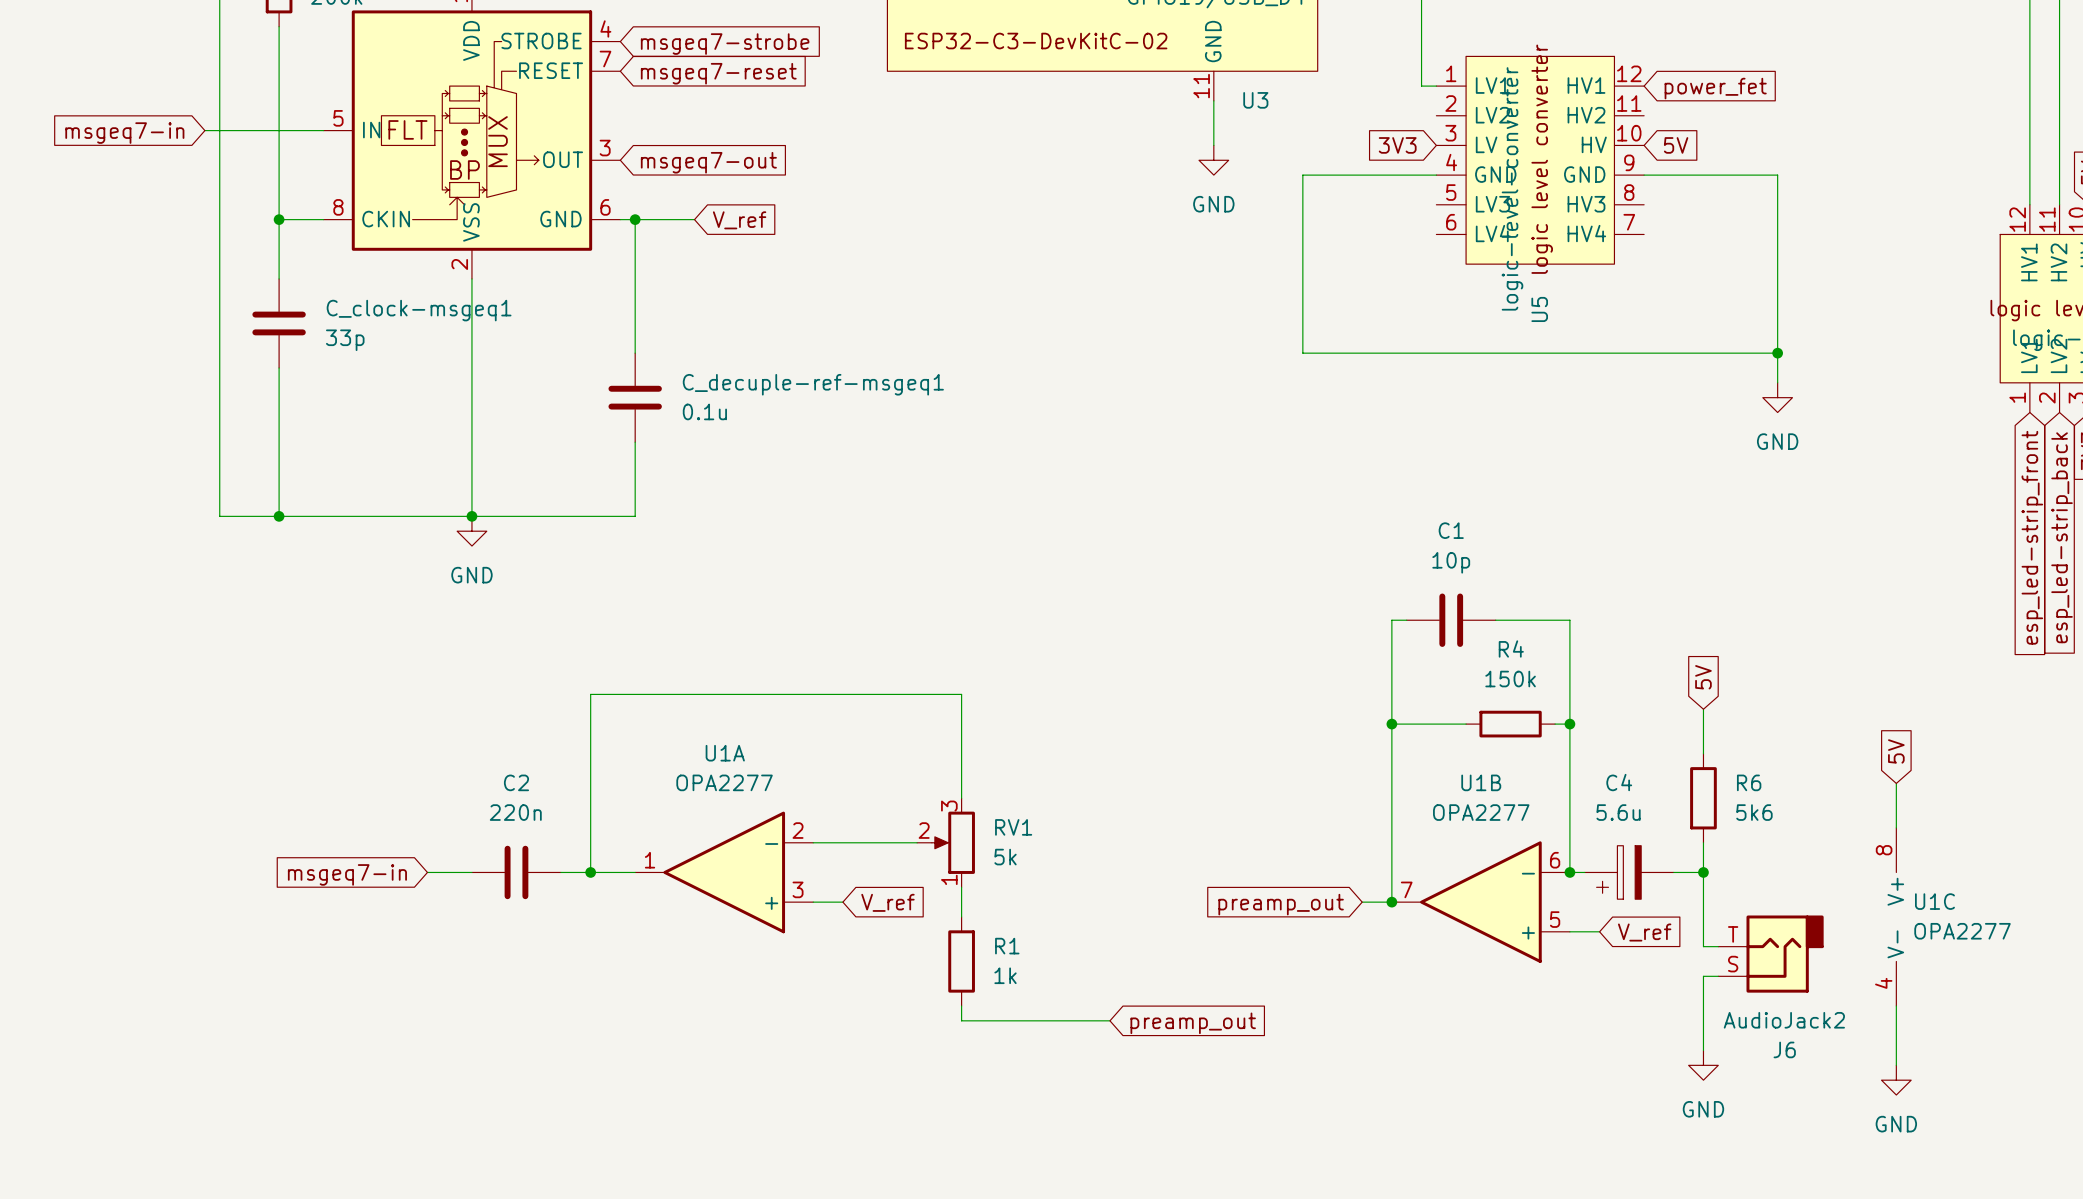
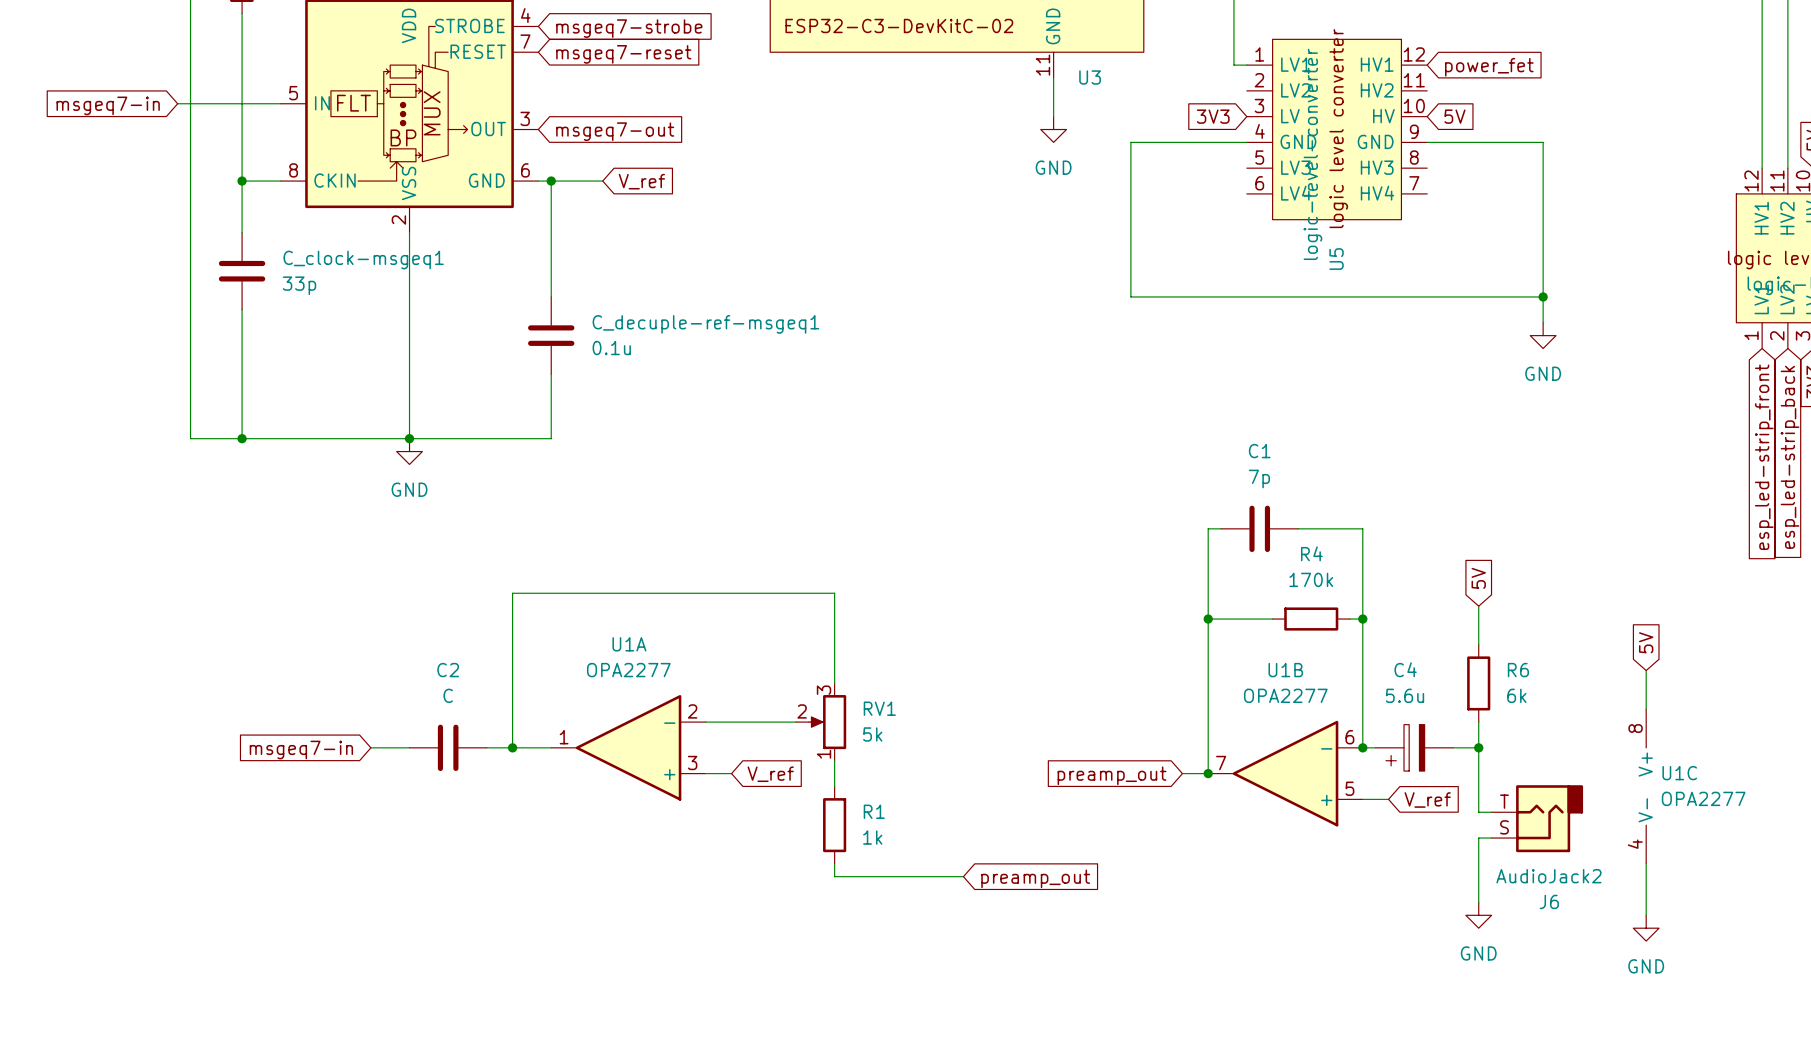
C1 value: 10p (1451, 562) -> 7p (1259, 478)
R4 value: 150k (1510, 679) -> 170k (1311, 579)
C2 value: 220n (515, 812) -> C (448, 695)
R6 value: 5k6 (1754, 812) -> 6k (1516, 695)

